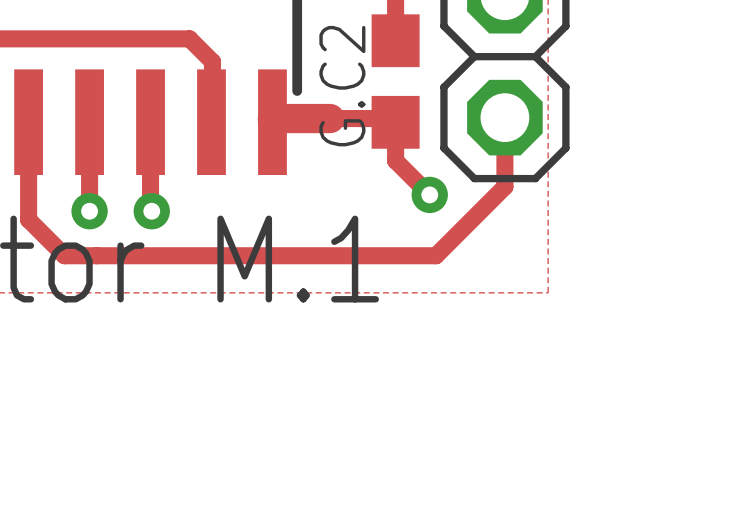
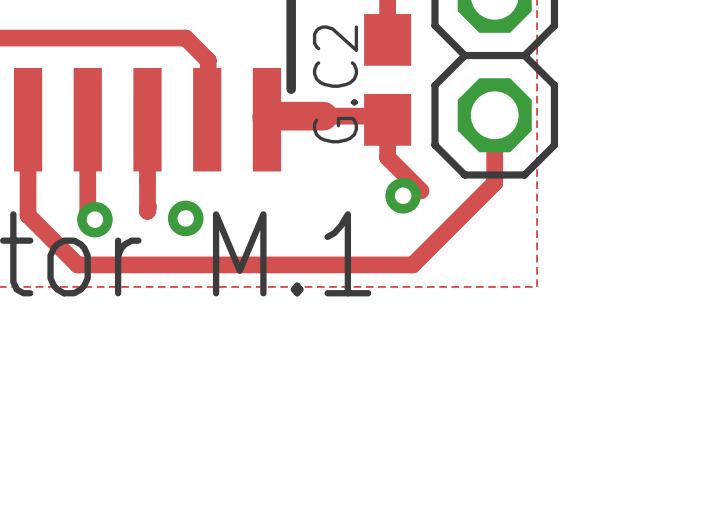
via position: (429, 194) -> (403, 195)
via position: (89, 211) -> (94, 219)
via: (151, 211) -> none
via: none -> (185, 218)
track: (64, 255) (435, 255) -> (63, 250) (77, 264) (412, 264) (427, 250)

